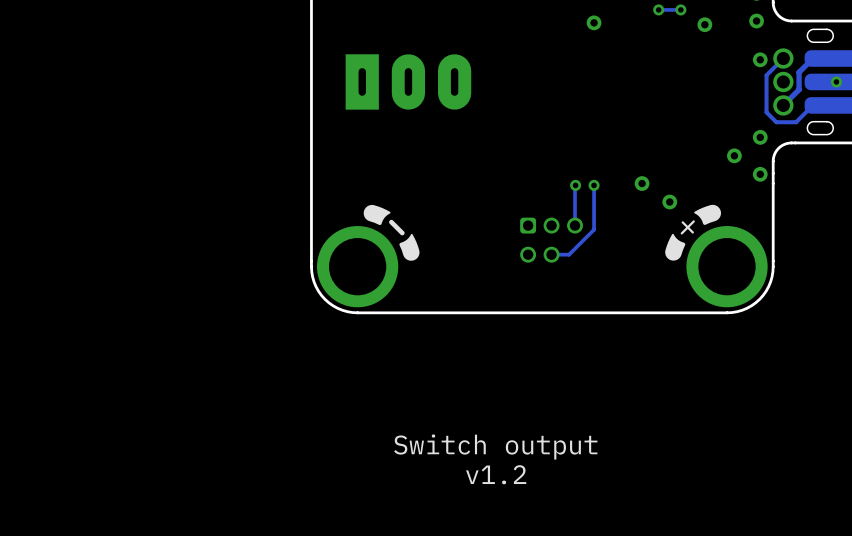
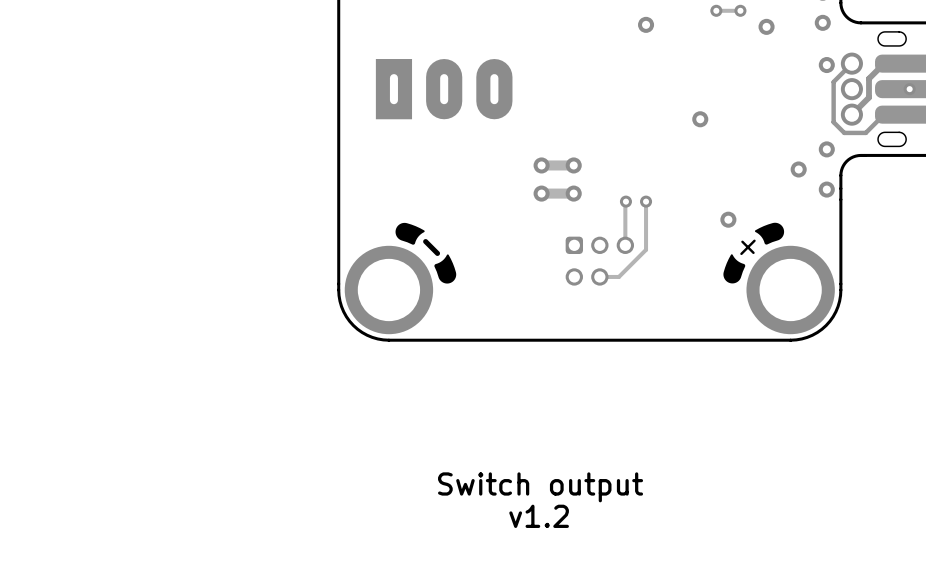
via: none -> (700, 119)
via: none -> (541, 165)
track: none -> (573, 165) (541, 165)
via: none -> (573, 165)
via: none -> (541, 193)
track: none -> (573, 193) (541, 193)
via: none -> (573, 193)
via: (642, 183) -> none

